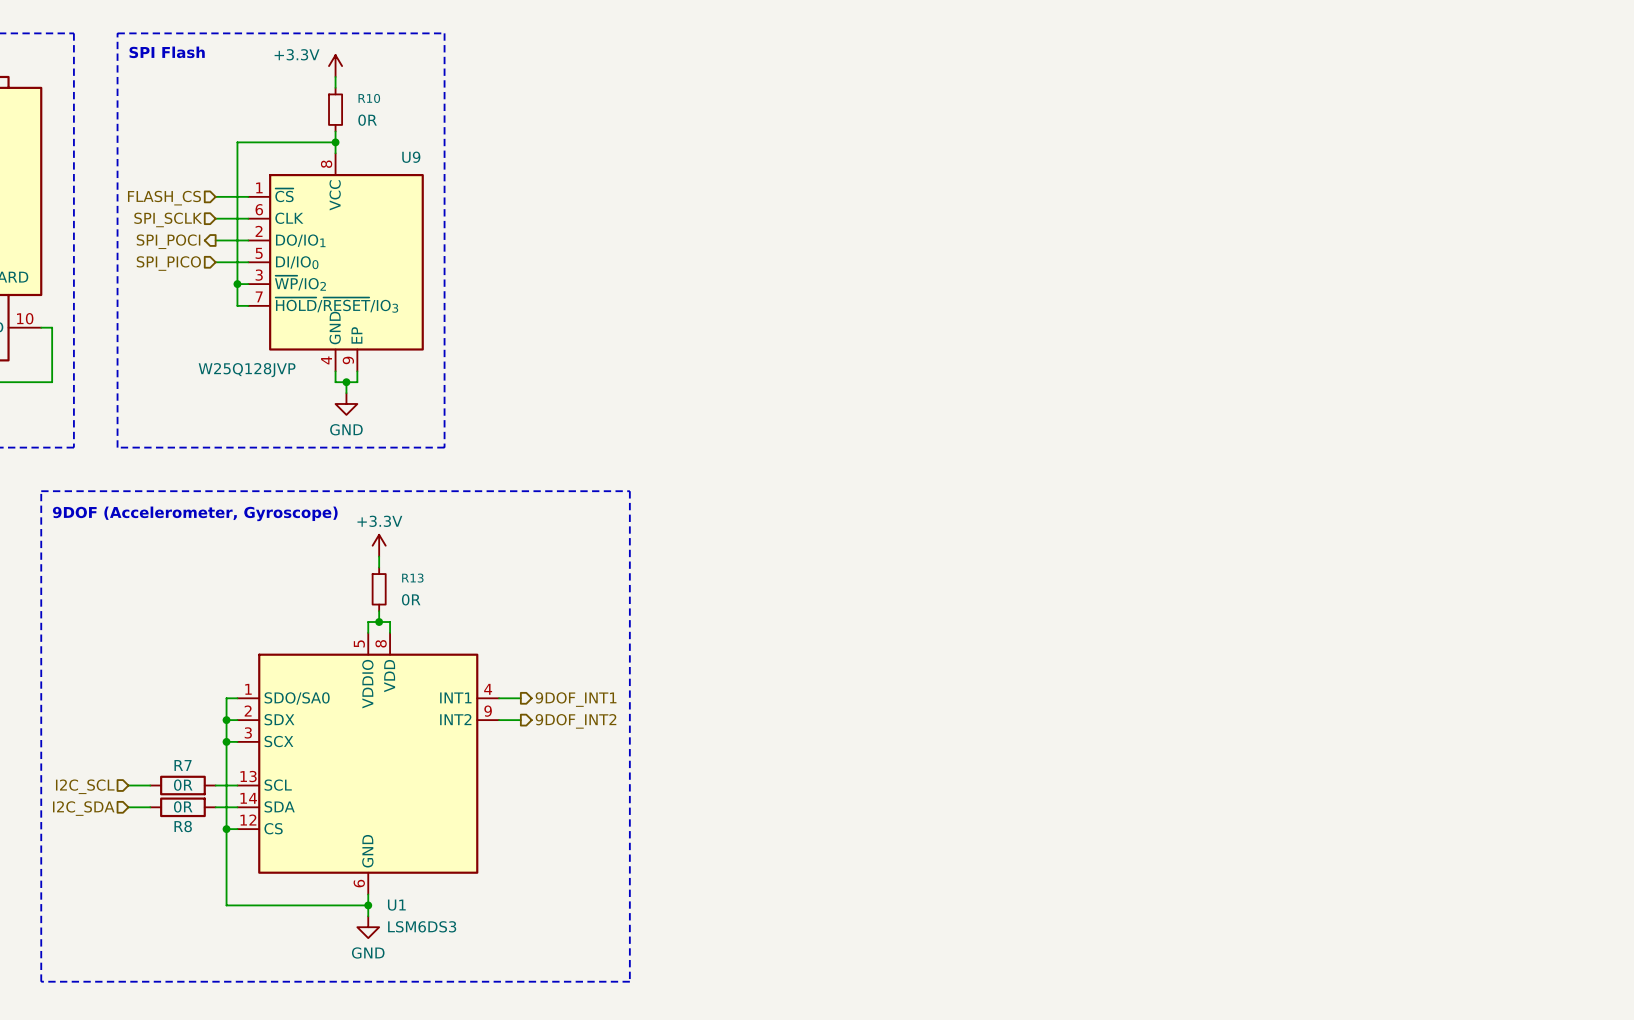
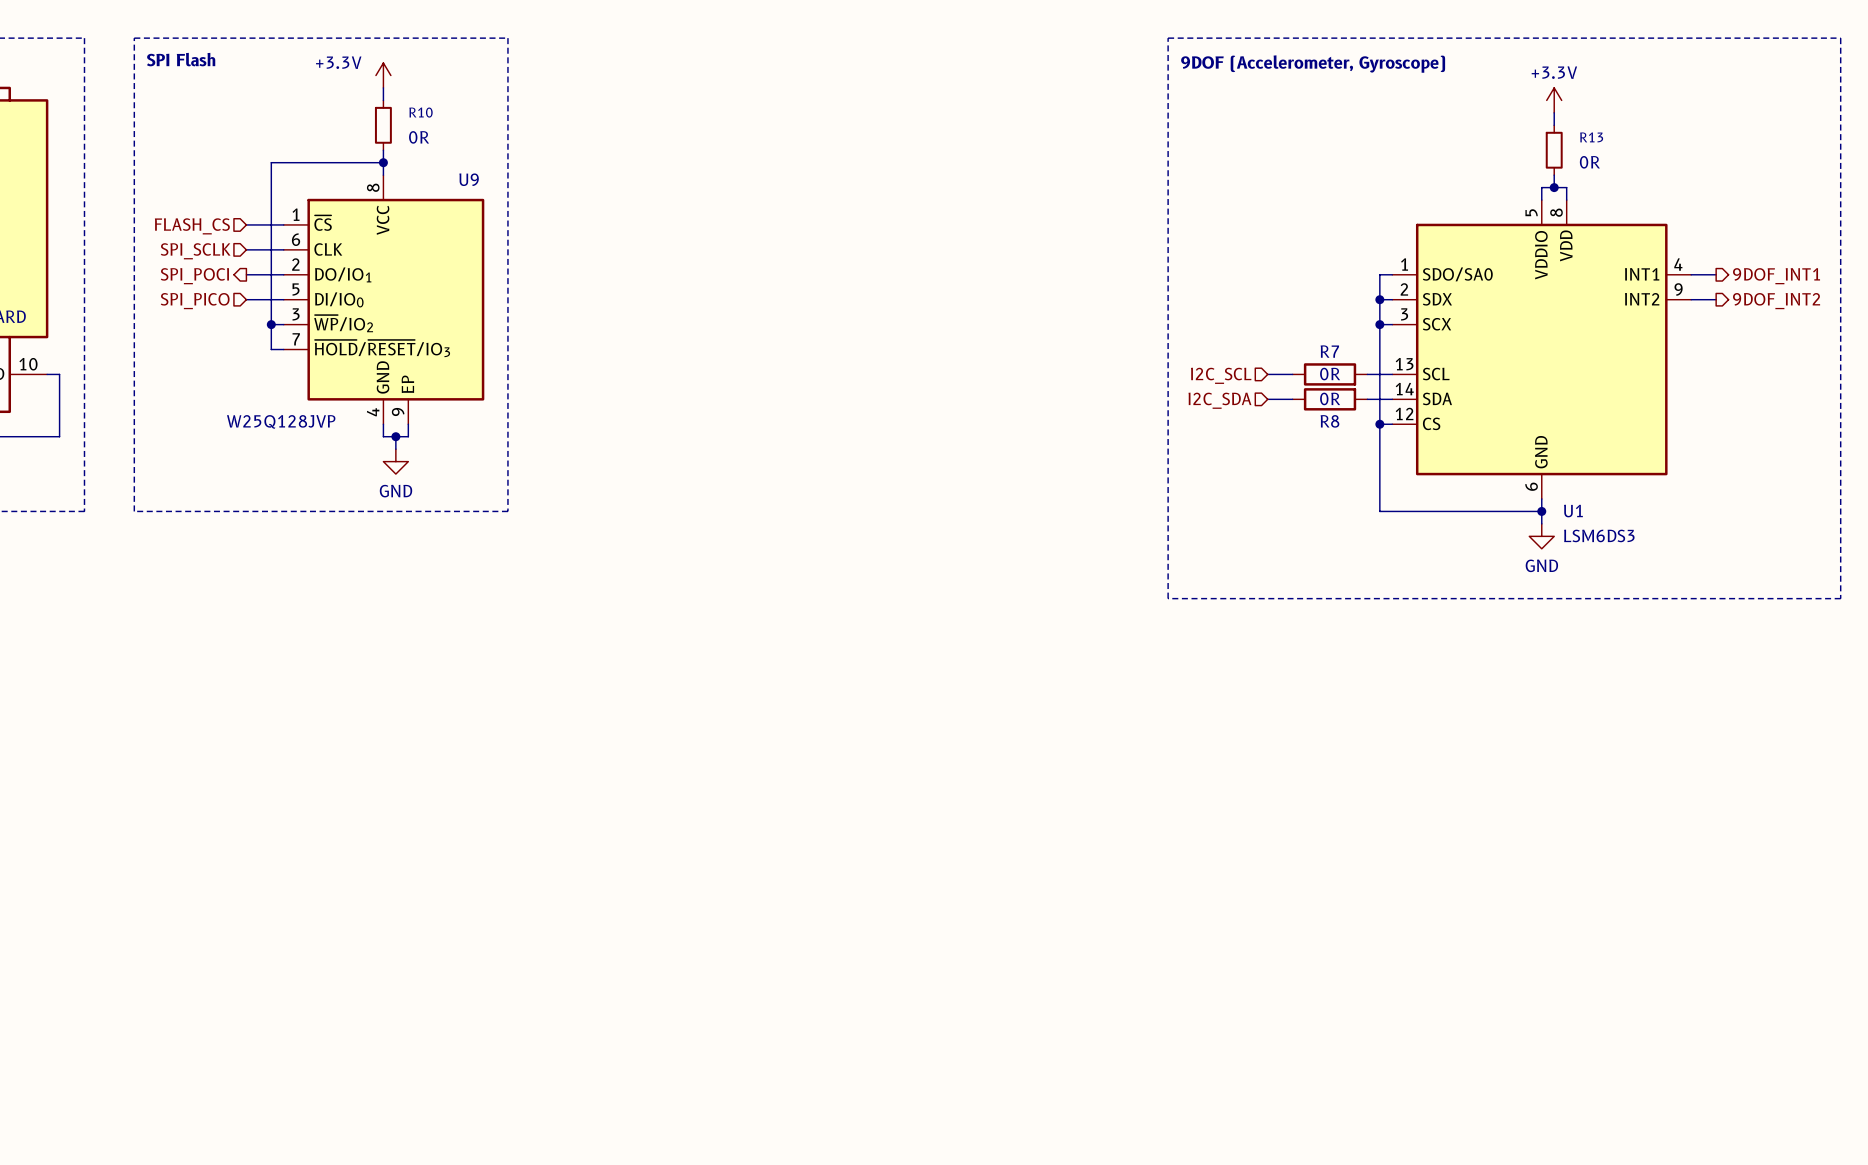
line: none -> (1168, 38) (1840, 38) (1840, 598) (1168, 598) (1168, 38)
text: none -> 9DOF (Accelerometer, Gyroscope) (1313, 64)
power symbol: none -> +3.3V (1554, 100)
wire: none -> (1554, 112) (1554, 125)
wire: none -> (1554, 175) (1554, 187)
junction: none -> (1554, 187)
wire: none -> (1541, 200) (1541, 187) (1566, 187) (1566, 200)
wire: none -> (1392, 274) (1379, 274) (1379, 511) (1541, 511)
wire: none -> (1691, 274) (1716, 274)
hierarchical label: none -> 9DOF_INT1 (1776, 276)
wire: none -> (1379, 299) (1392, 299)
junction: none -> (1379, 299)
wire: none -> (1691, 299) (1716, 299)
hierarchical label: none -> 9DOF_INT2 (1776, 301)
wire: none -> (1379, 324) (1392, 324)
junction: none -> (1379, 324)
wire: none -> (1267, 374) (1292, 374)
wire: none -> (1367, 374) (1392, 374)
hierarchical label: none -> I2C_SCL (1221, 375)
wire: none -> (1267, 399) (1292, 399)
wire: none -> (1367, 399) (1392, 399)
hierarchical label: none -> I2C_SDA (1219, 400)
wire: none -> (1379, 424) (1392, 424)
junction: none -> (1379, 424)
wire: none -> (1541, 498) (1541, 523)
junction: none -> (1541, 511)
power symbol: none -> GND (1541, 536)
line: (41, 491) (629, 491) (629, 981) (41, 981) (41, 491) -> none
text: 9DOF (Accelerometer, Gyroscope) (195, 513) -> none
power symbol: +3.3V (379, 545) -> none
wire: (379, 556) (379, 567) -> none
R13 position: (379, 589) -> (1554, 150)
wire: (379, 611) (379, 622) -> none
junction: (379, 622) -> none
wire: (368, 632) (368, 622) (390, 622) (390, 632) -> none
wire: (237, 698) (226, 698) (226, 905) (368, 905) -> none
wire: (499, 698) (520, 698) -> none
hierarchical label: 9DOF_INT1 (576, 699) -> none
wire: (226, 720) (237, 720) -> none
junction: (226, 720) -> none
wire: (499, 720) (520, 720) -> none
hierarchical label: 9DOF_INT2 (575, 721) -> none
wire: (226, 741) (237, 741) -> none
junction: (226, 741) -> none
U1 position: (368, 763) -> (1541, 349)
wire: (128, 785) (150, 785) -> none
R7 position: (182, 785) -> (1330, 374)
wire: (215, 785) (237, 785) -> none
hierarchical label: I2C_SCL (85, 786) -> none
wire: (128, 807) (150, 807) -> none
R8 position: (182, 807) -> (1330, 399)
wire: (215, 807) (237, 807) -> none
hierarchical label: I2C_SDA (83, 808) -> none
wire: (226, 829) (237, 829) -> none
junction: (226, 829) -> none
wire: (368, 894) (368, 916) -> none
junction: (368, 905) -> none
power symbol: GND (368, 927) -> none

